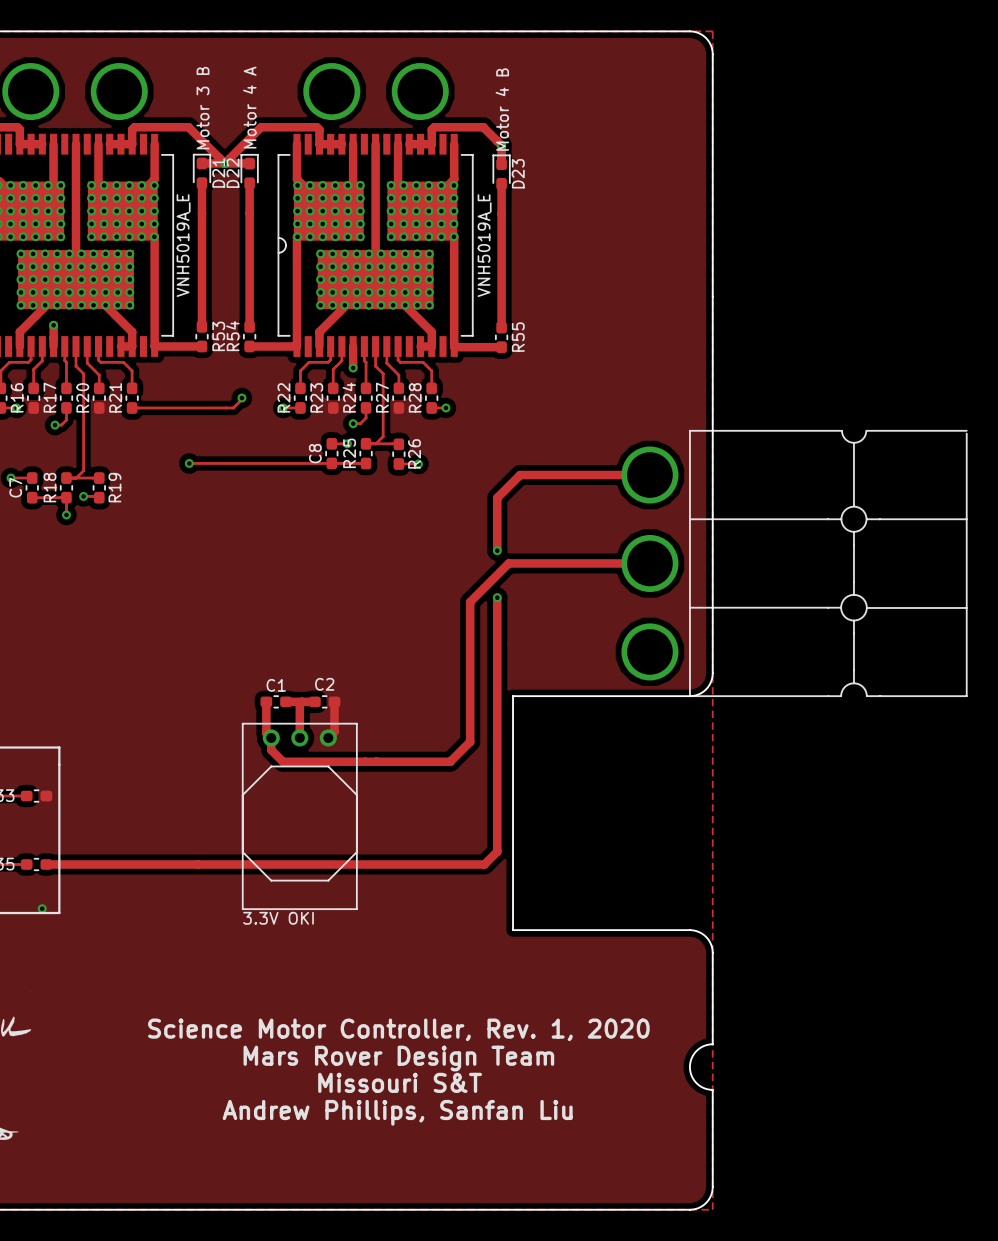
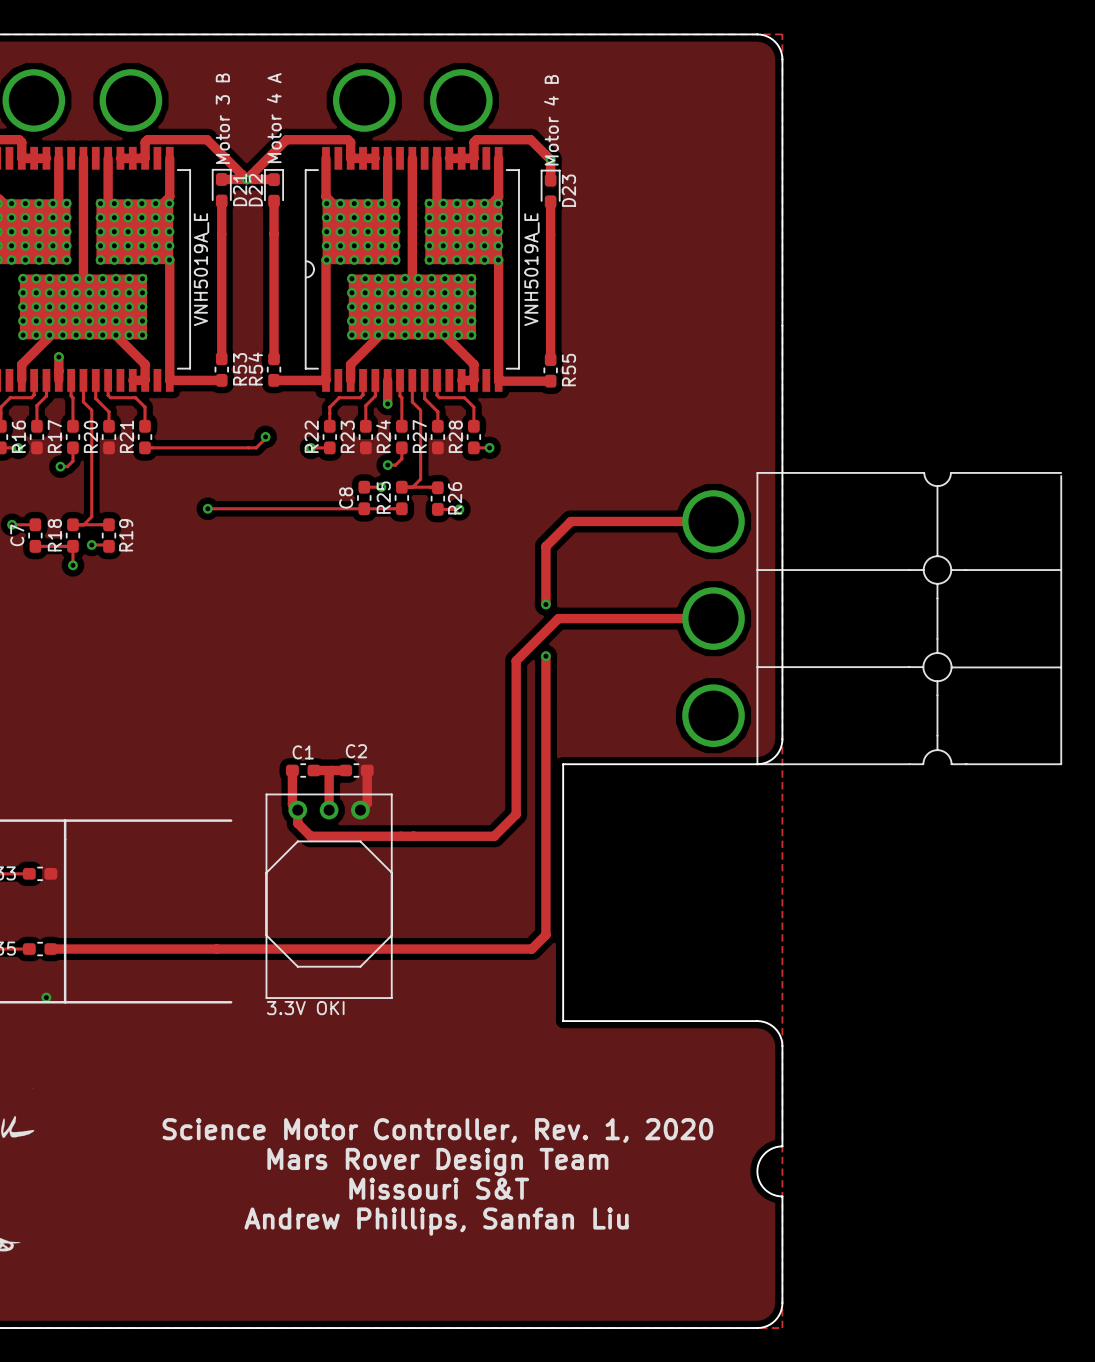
line: none -> (65, 820) (231, 820)
line: none -> (65, 1002) (231, 1002)

